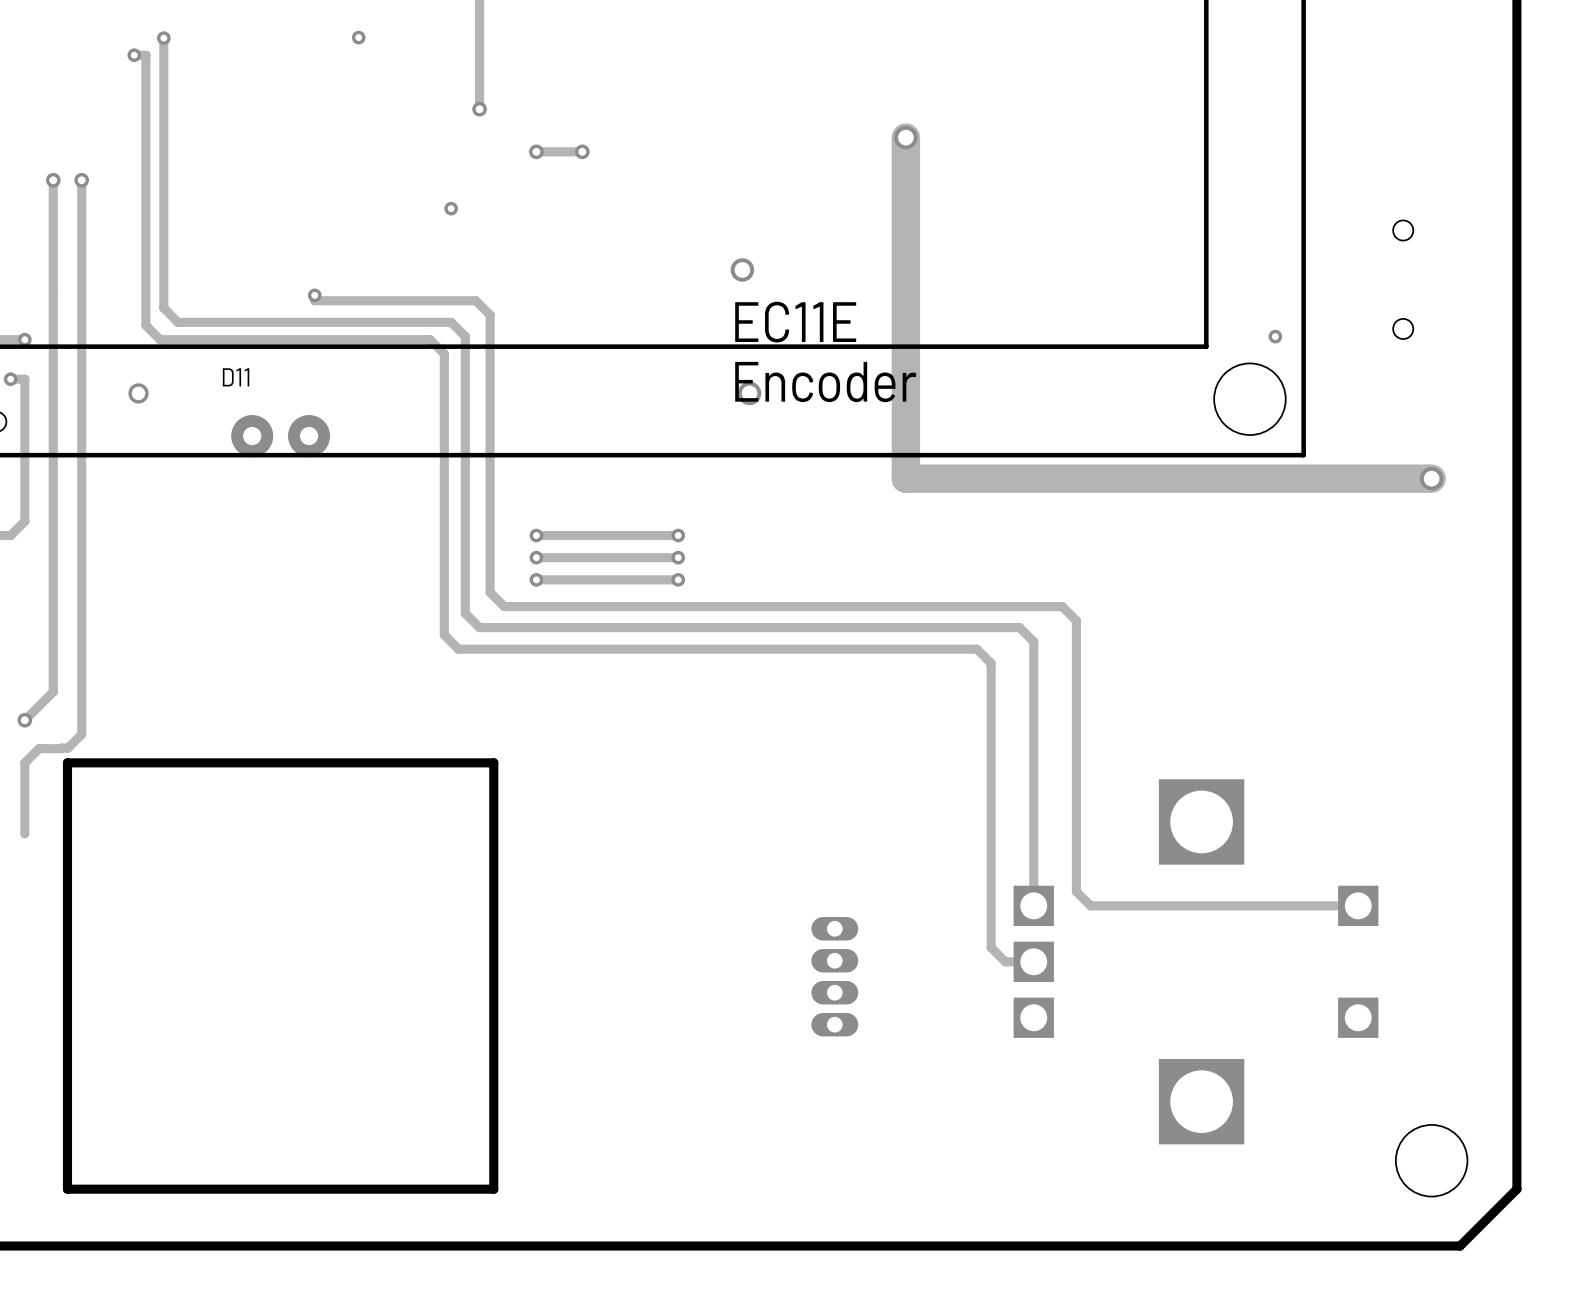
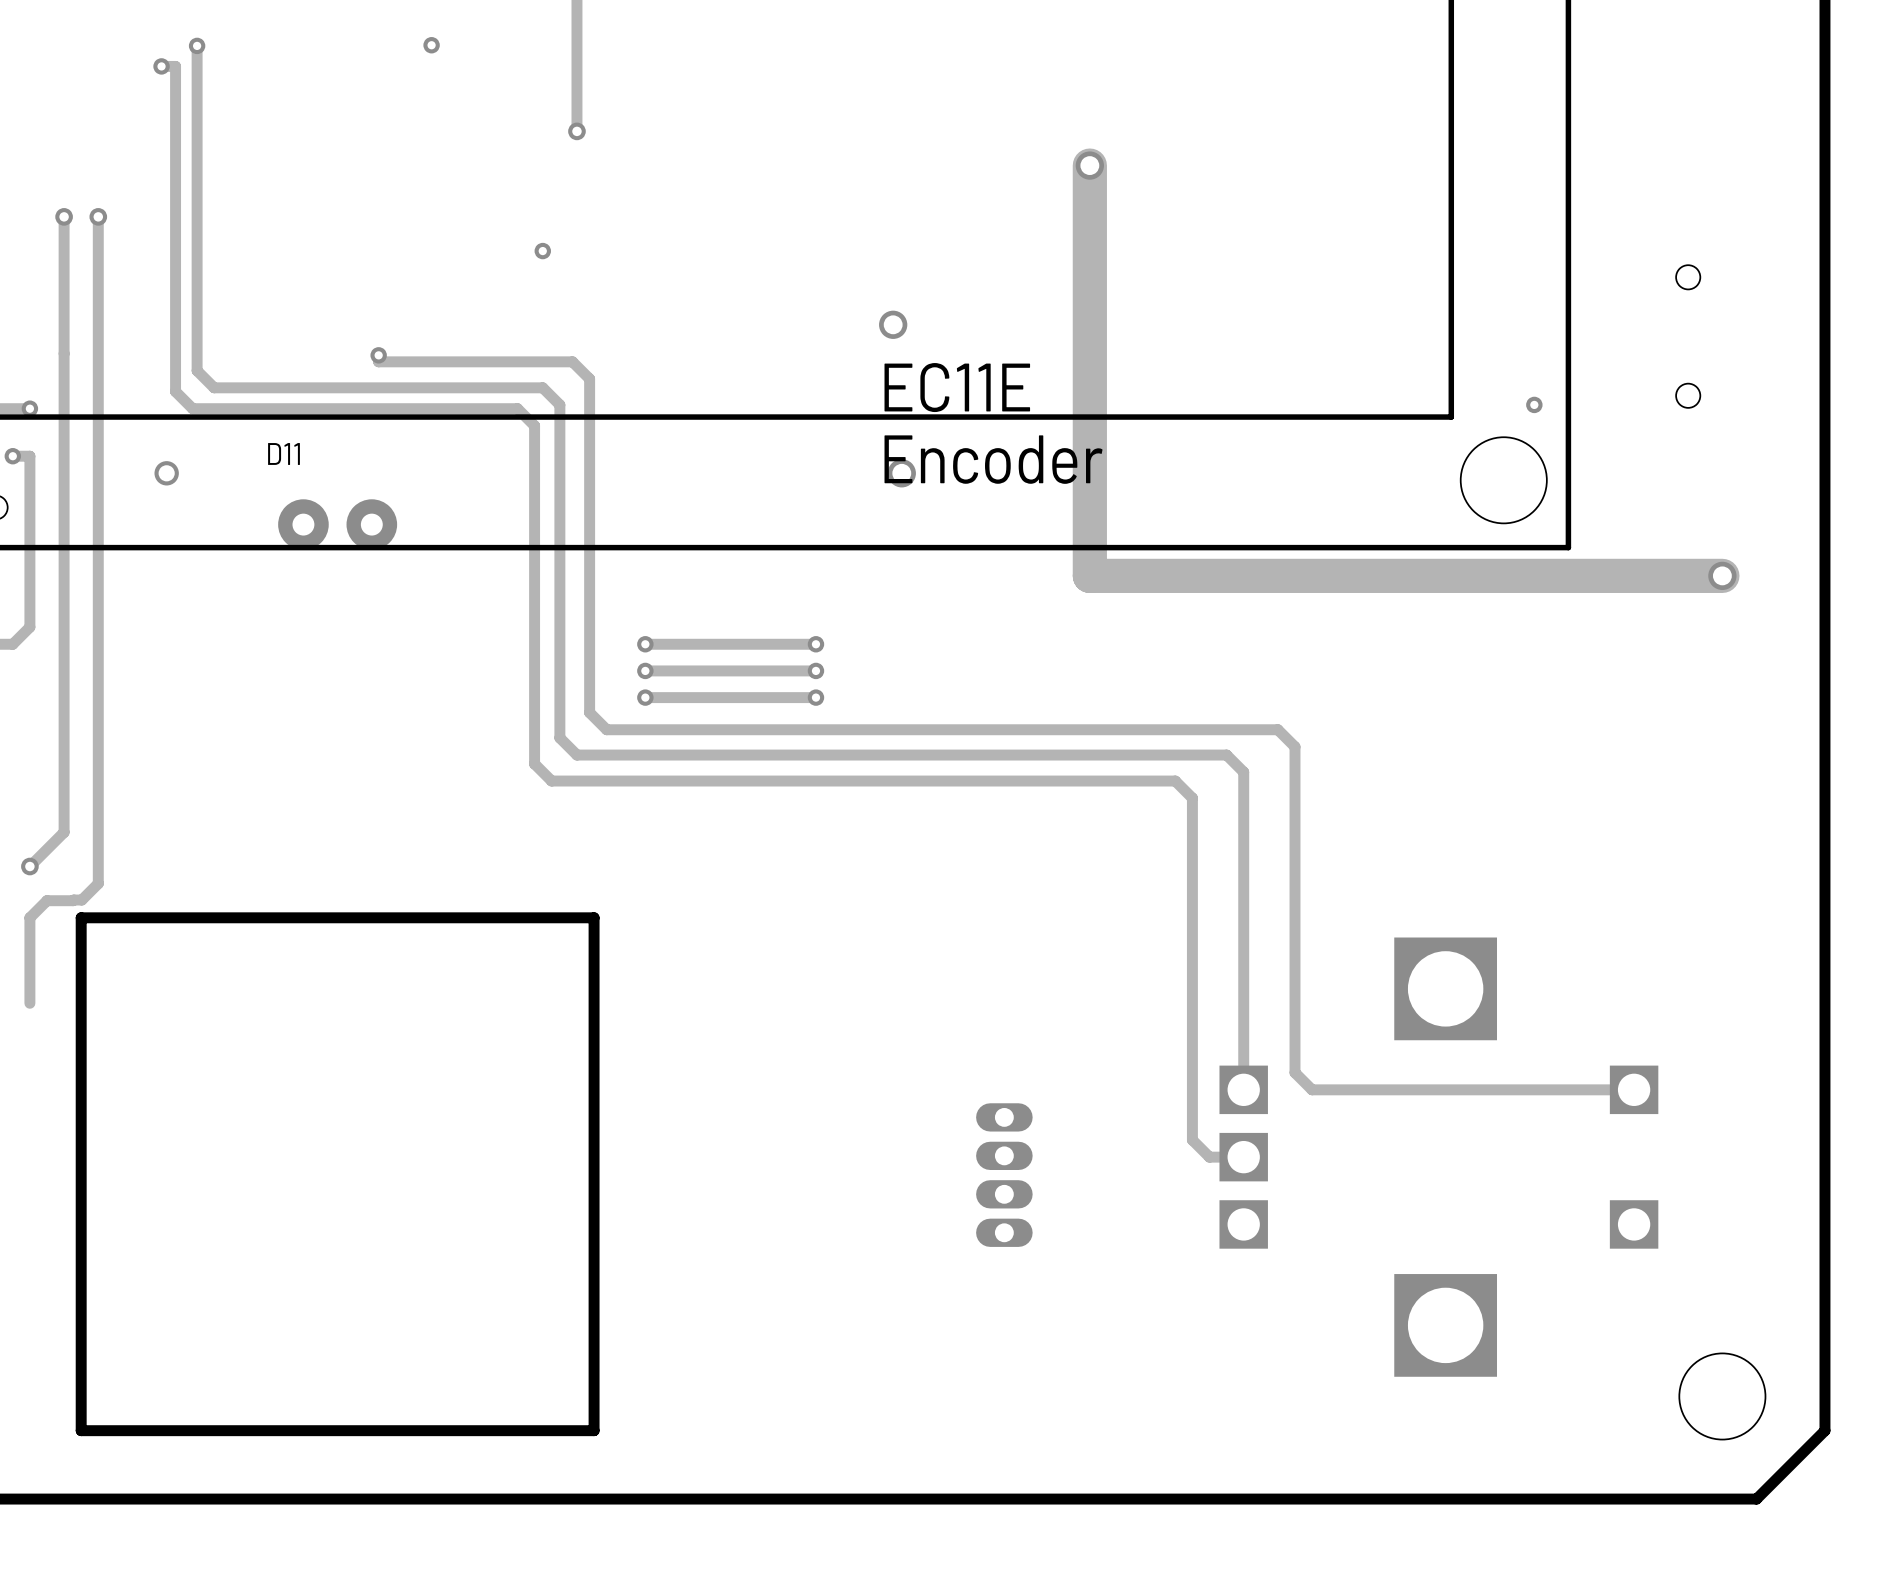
track: (536, 151) (582, 151) -> none
via: (536, 151) -> none
via: (582, 151) -> none

